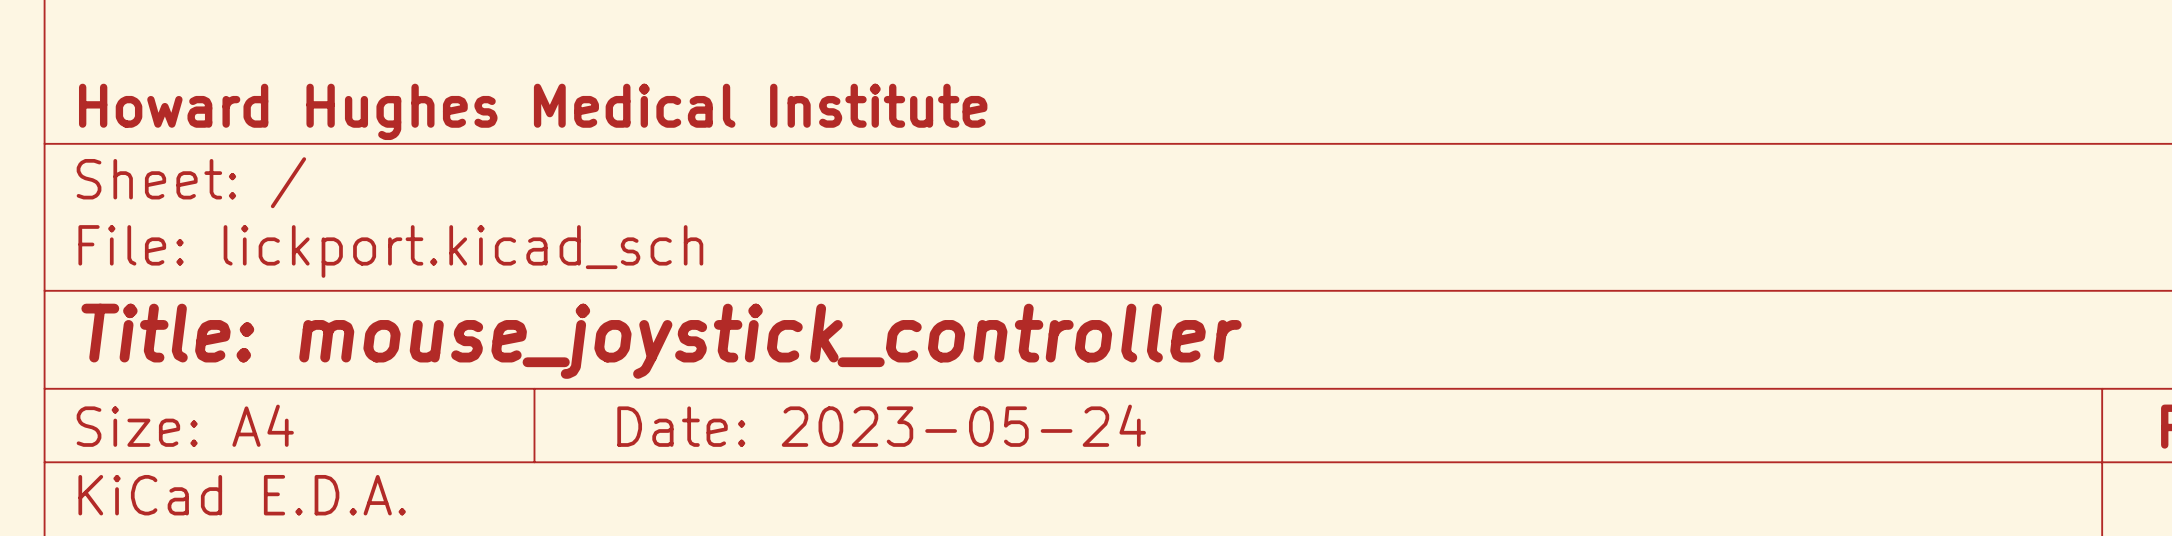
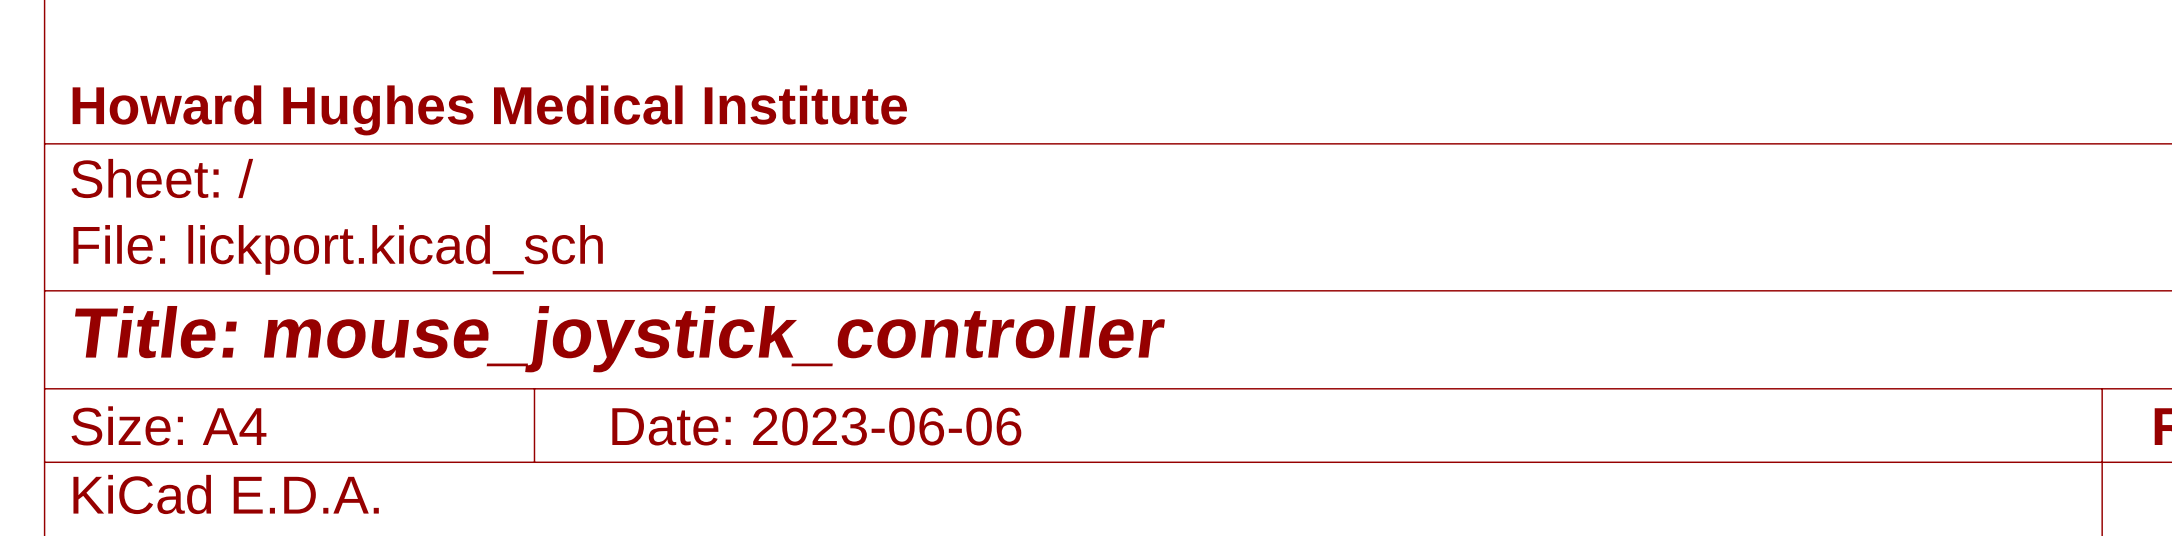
title block: Date: 2023-05-24 (881, 425) -> Date: 2023-06-06 (816, 426)

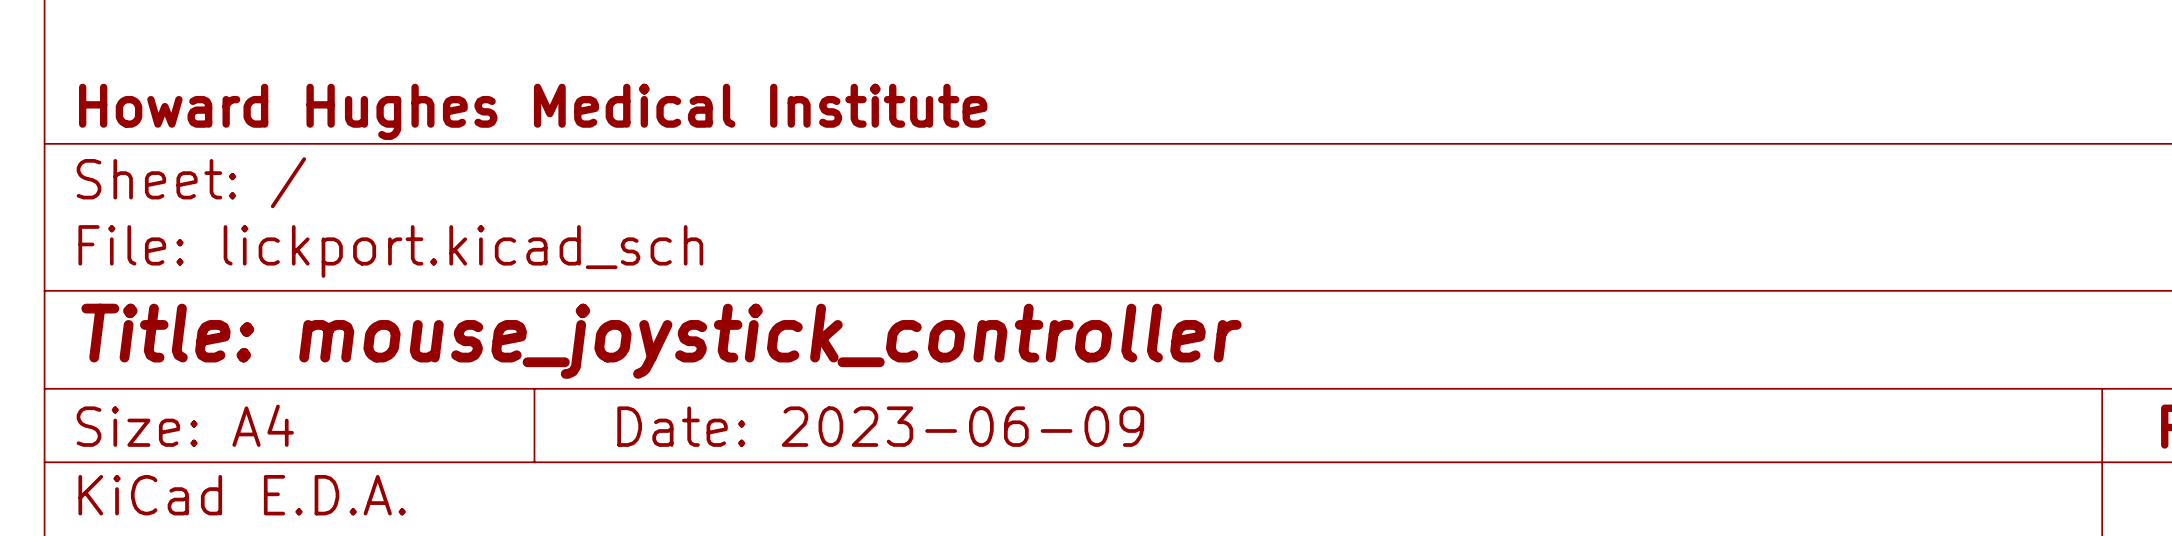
title block: Date: 2023-06-06 (816, 426) -> Date: 2023-06-09 (880, 426)

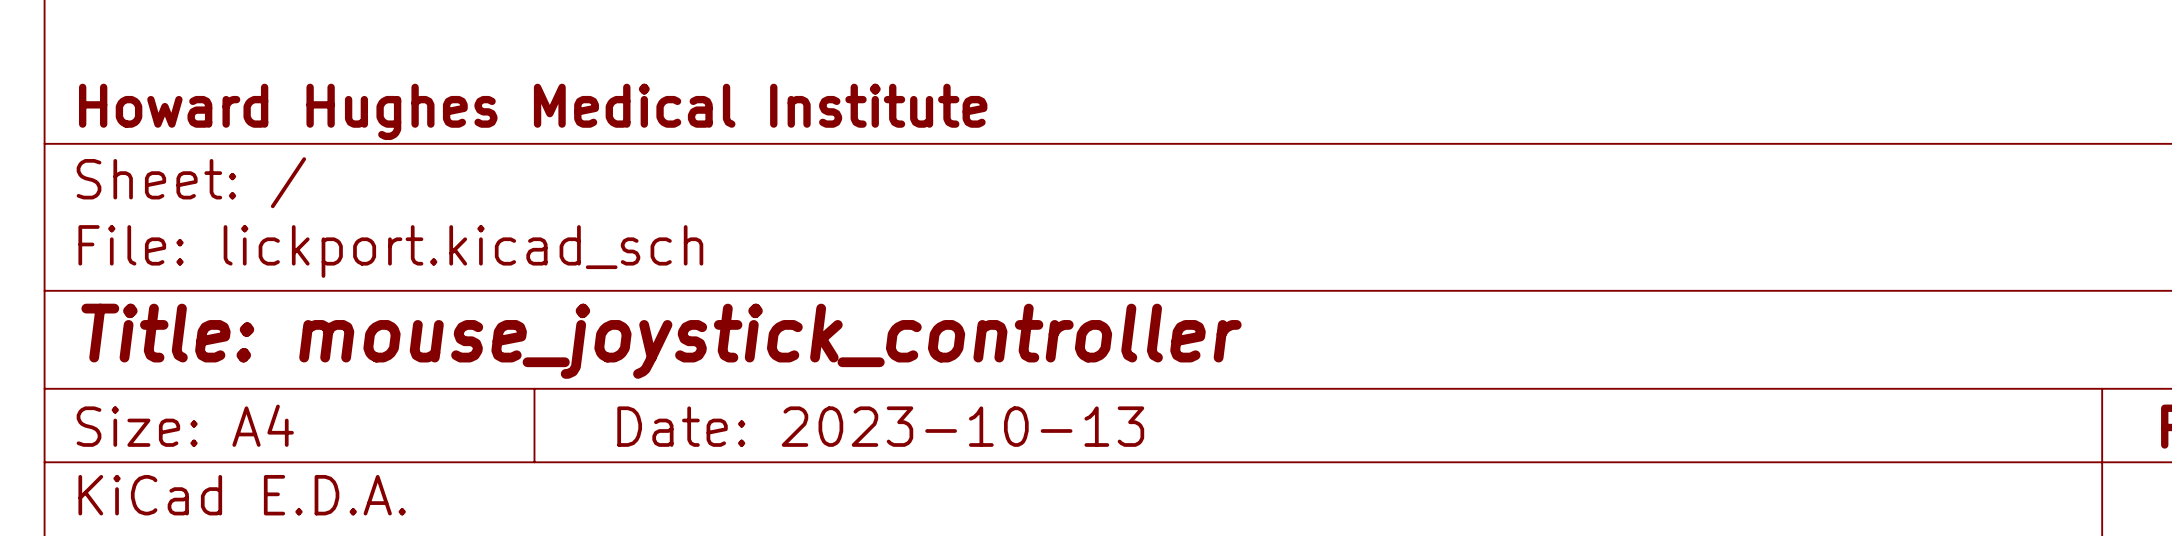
title block: Date: 2023-06-09 (880, 426) -> Date: 2023-10-13 (880, 426)

